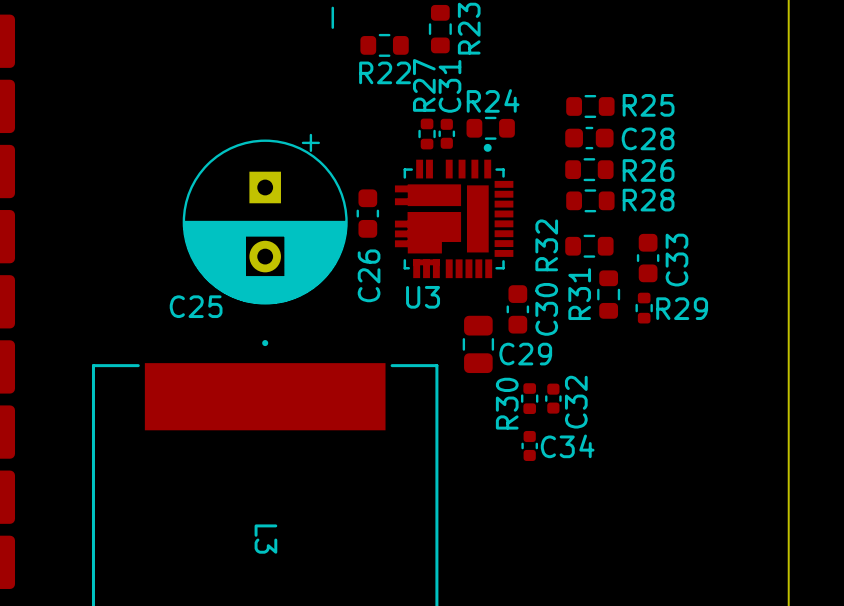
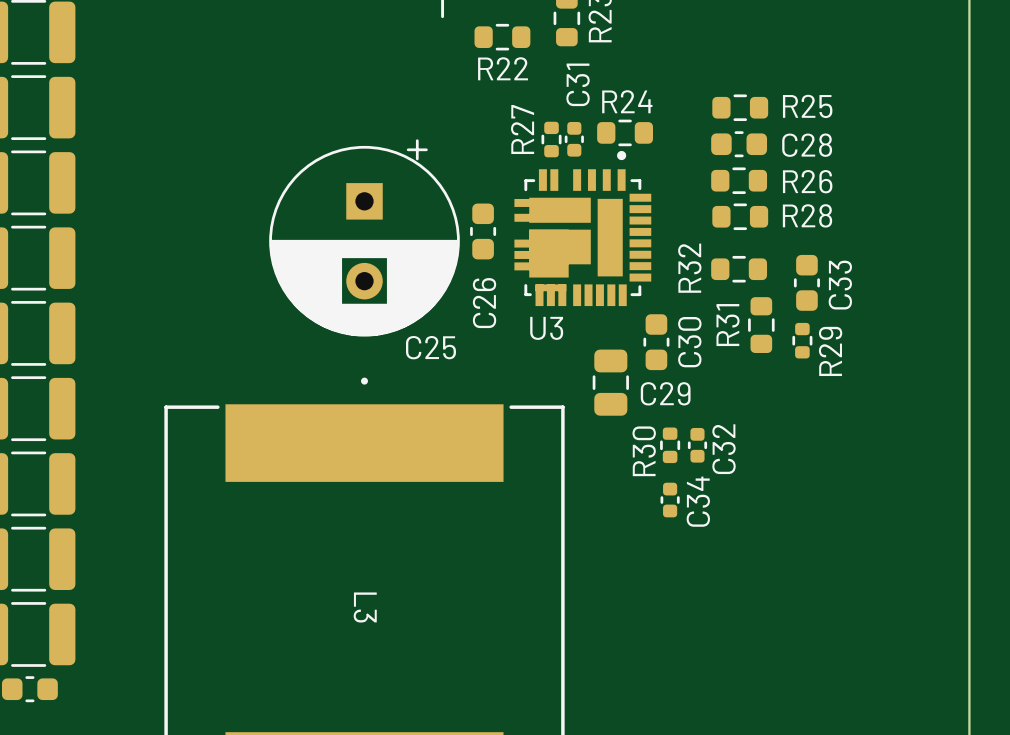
R27 name position: R27 (424, 85) -> R27 (522, 129)
C25 name position: C25 (196, 306) -> C25 (431, 347)
R29 name rotation: 0° (682, 308) -> 90° counterclockwise (830, 351)
C34 name rotation: 0° (567, 446) -> 90° counterclockwise (698, 501)

